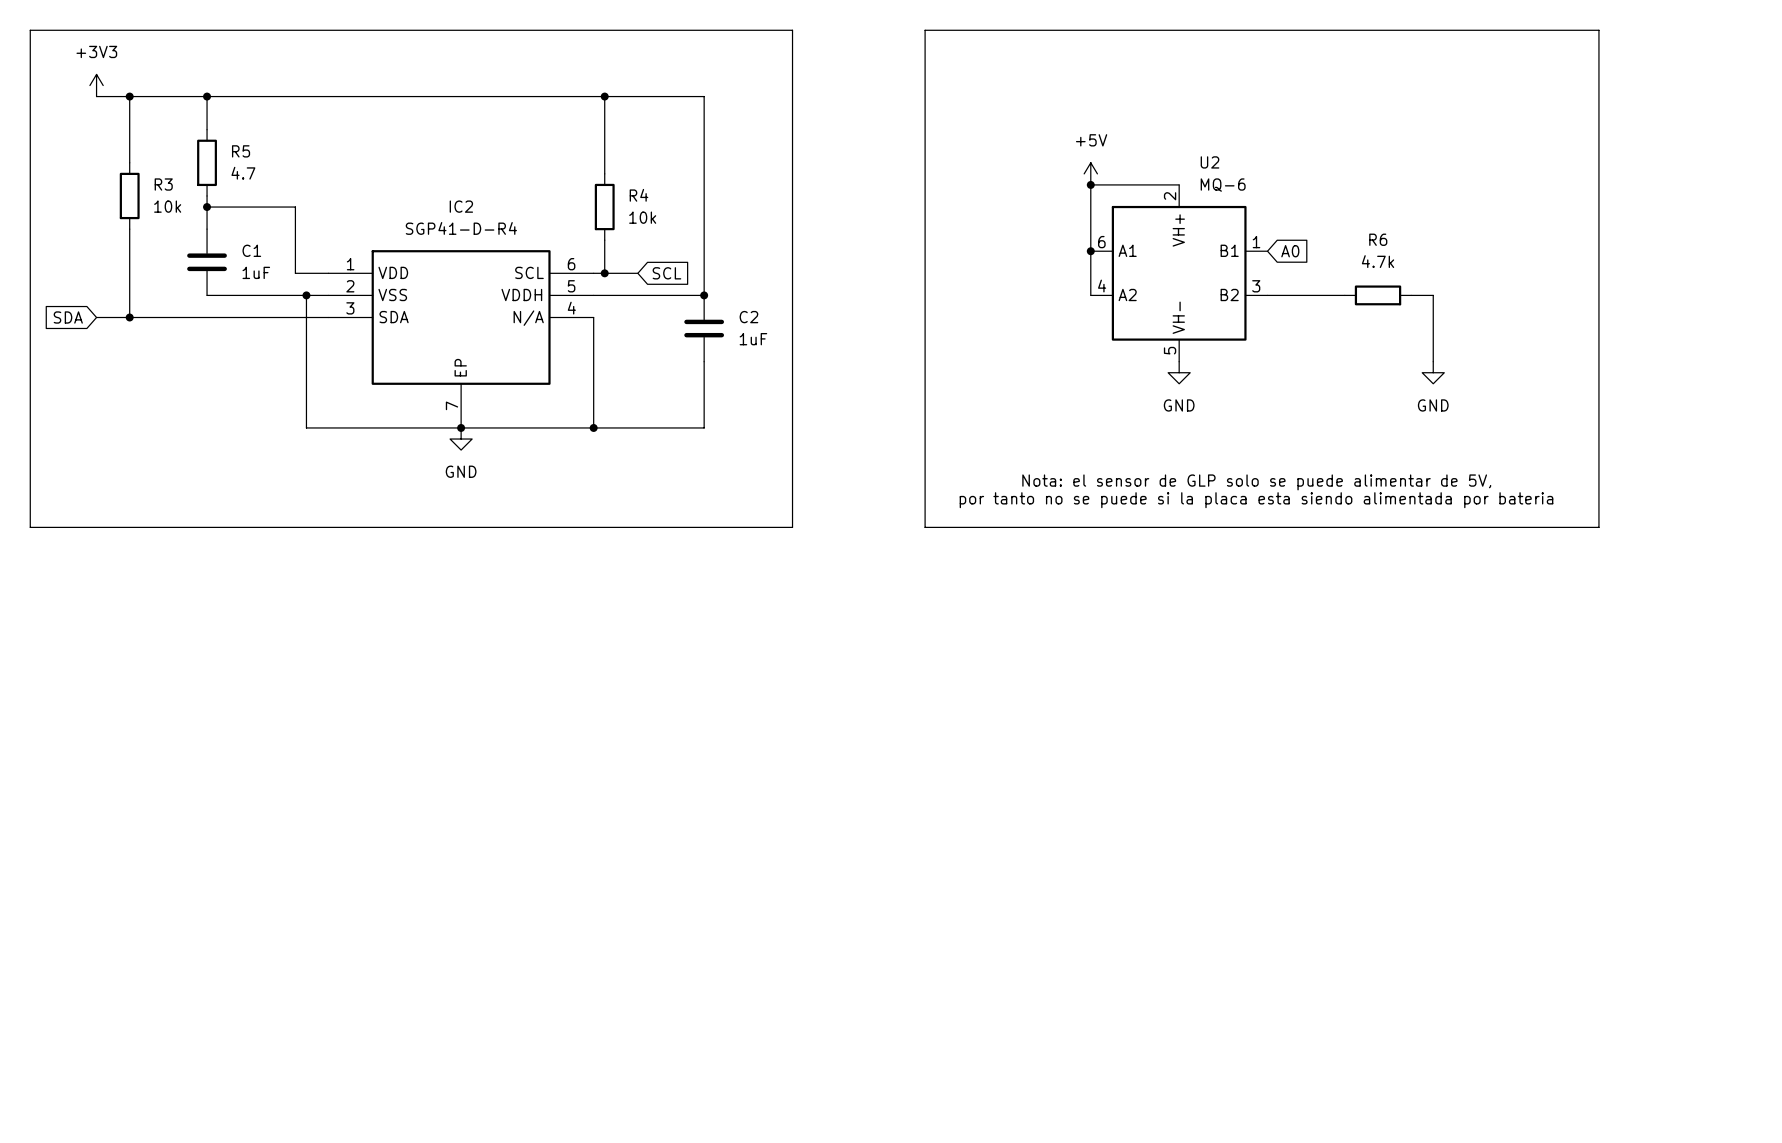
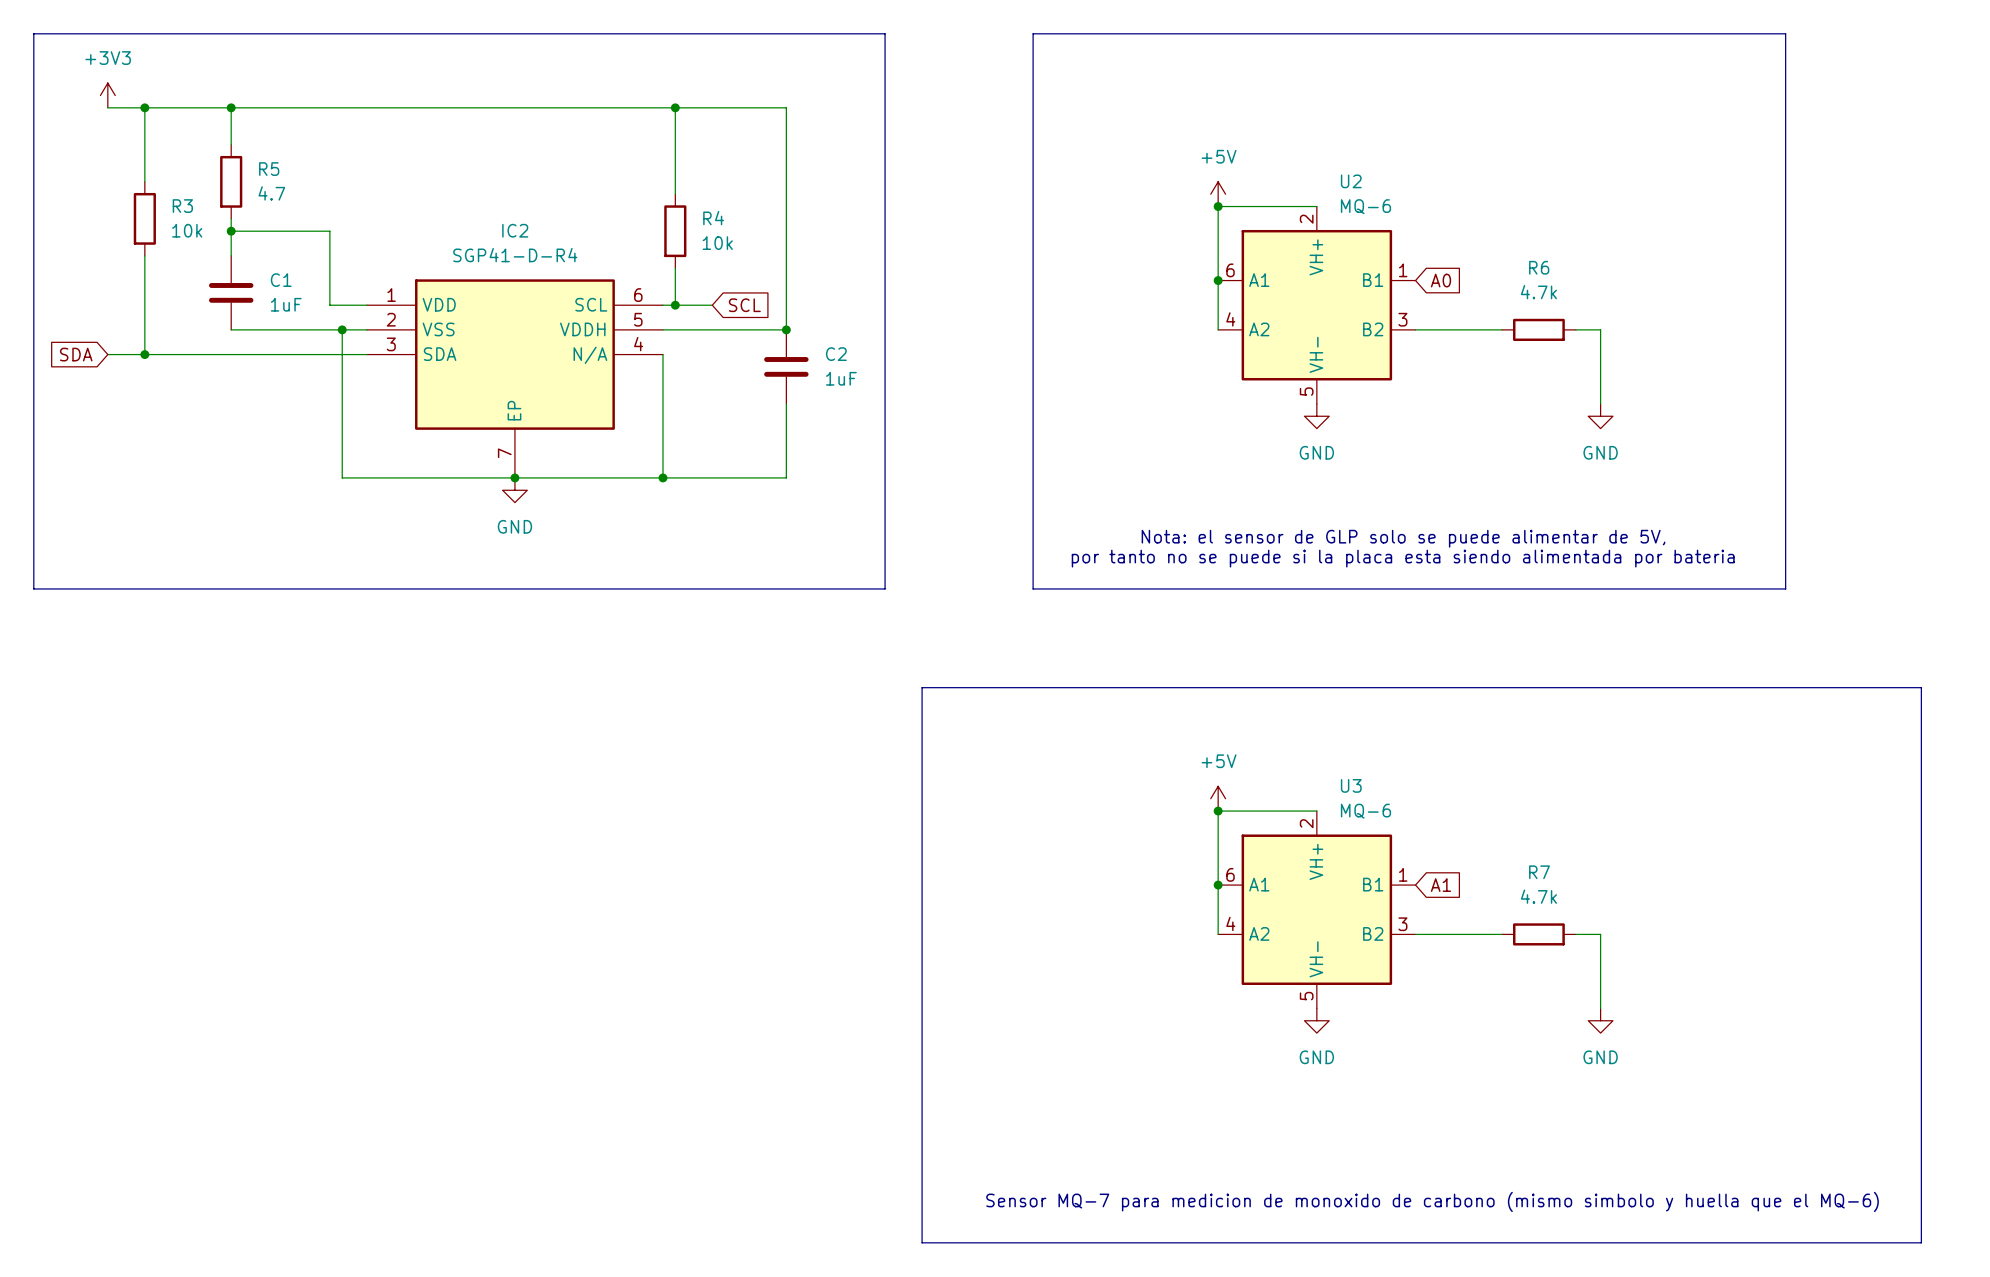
line: none -> (922, 687) (1921, 687) (1921, 1242) (922, 1242) (922, 687)
power symbol: none -> +5V (1218, 798)
junction: none -> (1218, 811)
wire: none -> (1316, 811) (1218, 811) (1218, 934)
junction: none -> (1218, 885)
global label: none -> A1 (1440, 885)
U3: none -> MQ-6 (1316, 909)
wire: none -> (1415, 934) (1501, 934)
R7: none -> 4.7k (1538, 934)
wire: none -> (1575, 934) (1600, 934) (1600, 1008)
power symbol: none -> GND (1316, 1020)
power symbol: none -> GND (1600, 1020)
text: none -> Sensor MQ-7 para medicion de monoxido de carbono (mismo simbolo y huella que el MQ-6) (1432, 1201)

